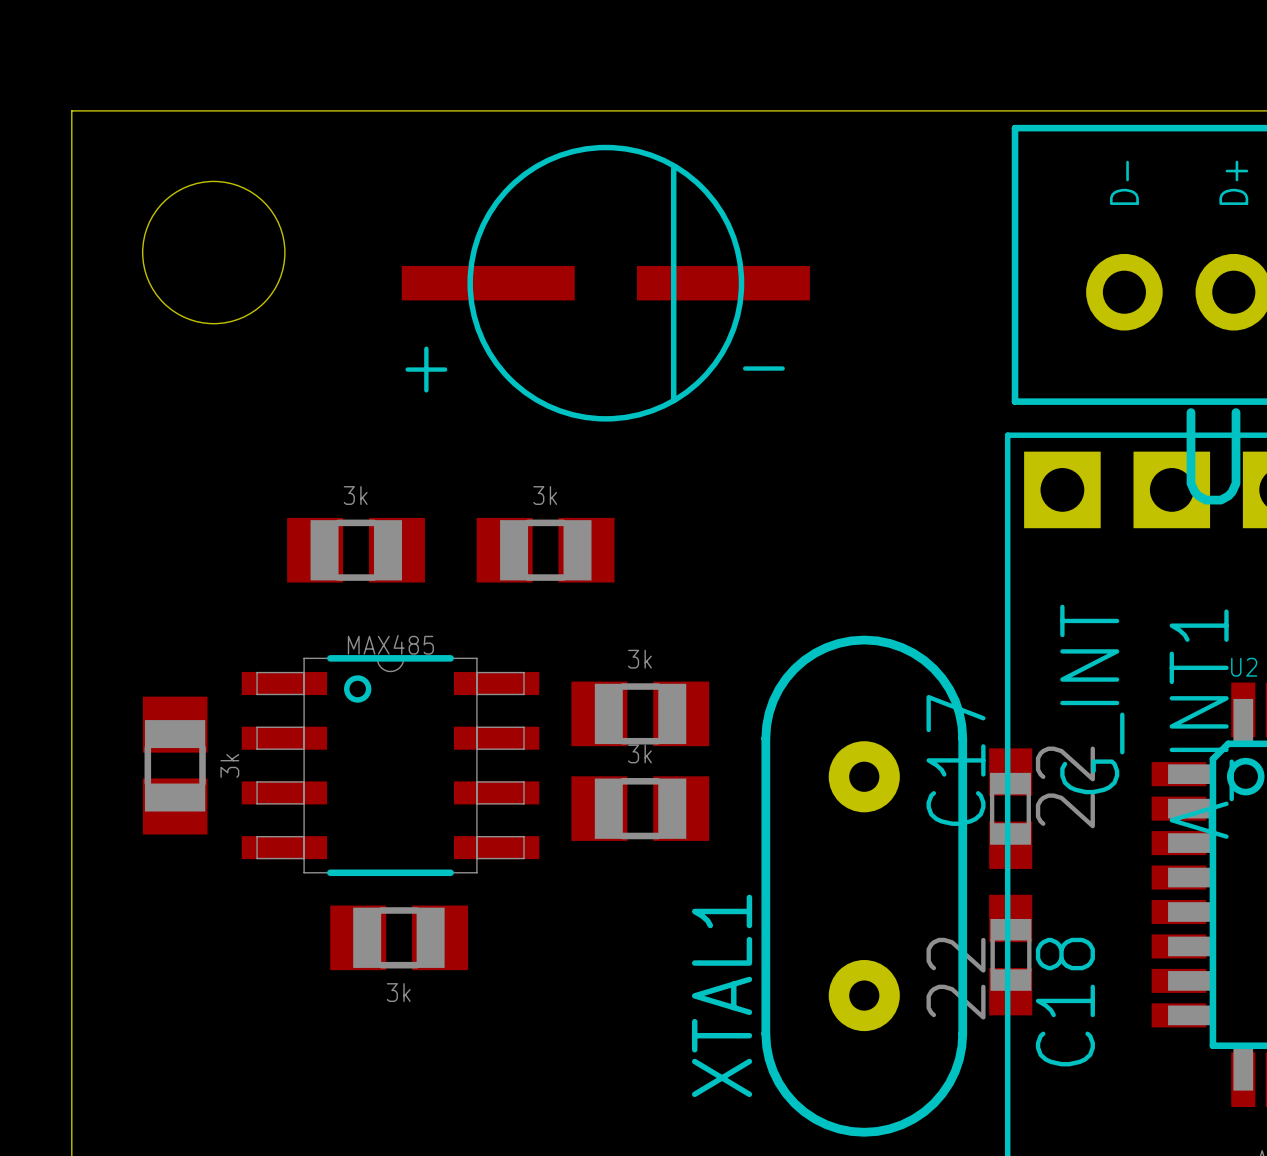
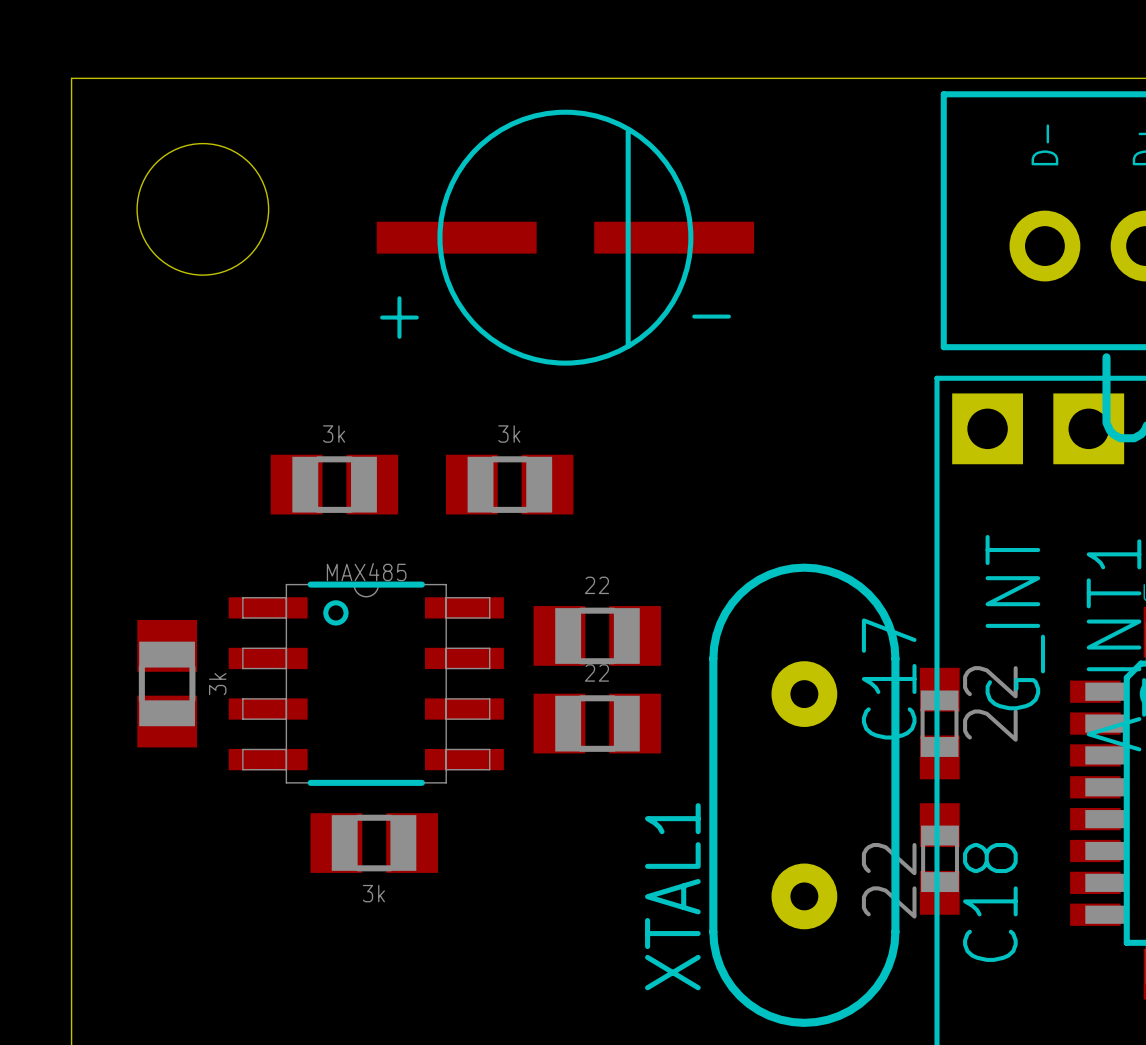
part value: 3k (639, 659) -> 22 (596, 585)
part value: 3k (639, 753) -> 22 (596, 672)

